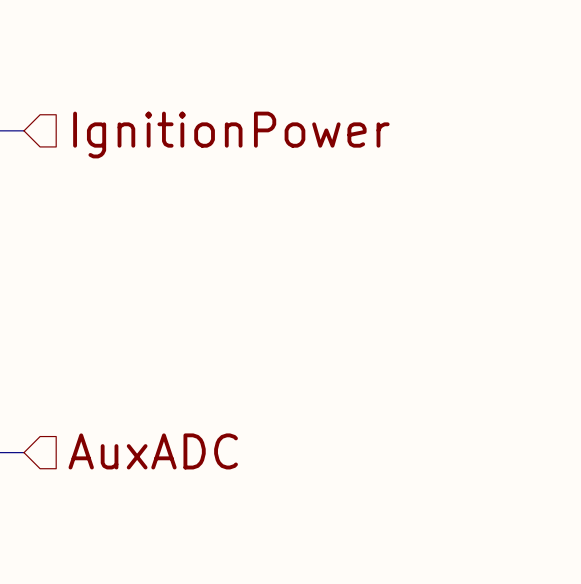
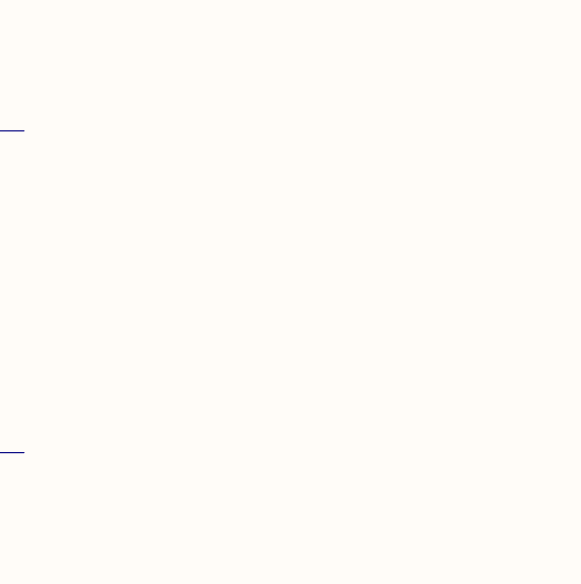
hierarchical label: IgnitionPower (231, 135) -> none
hierarchical label: AuxADC (153, 451) -> none

